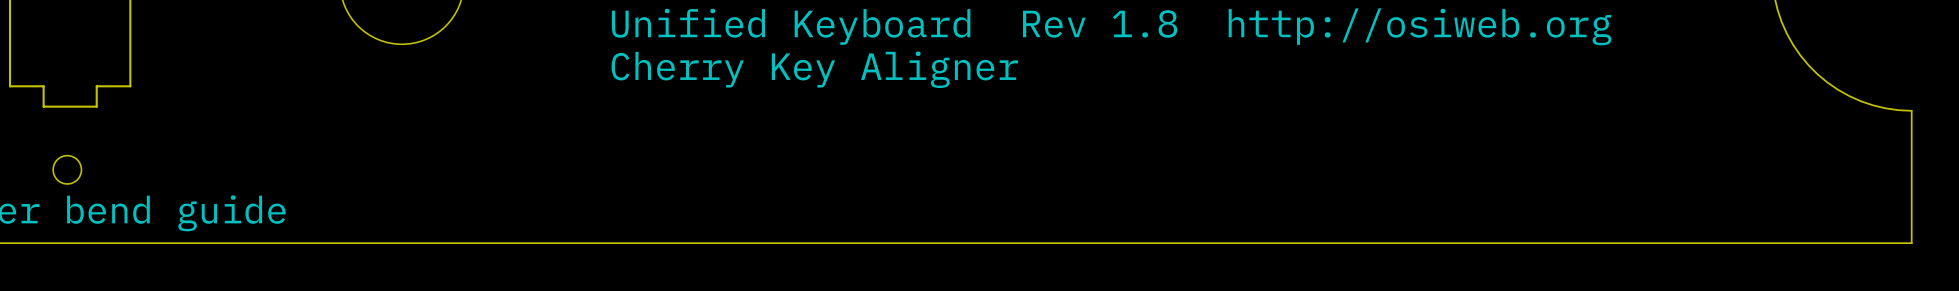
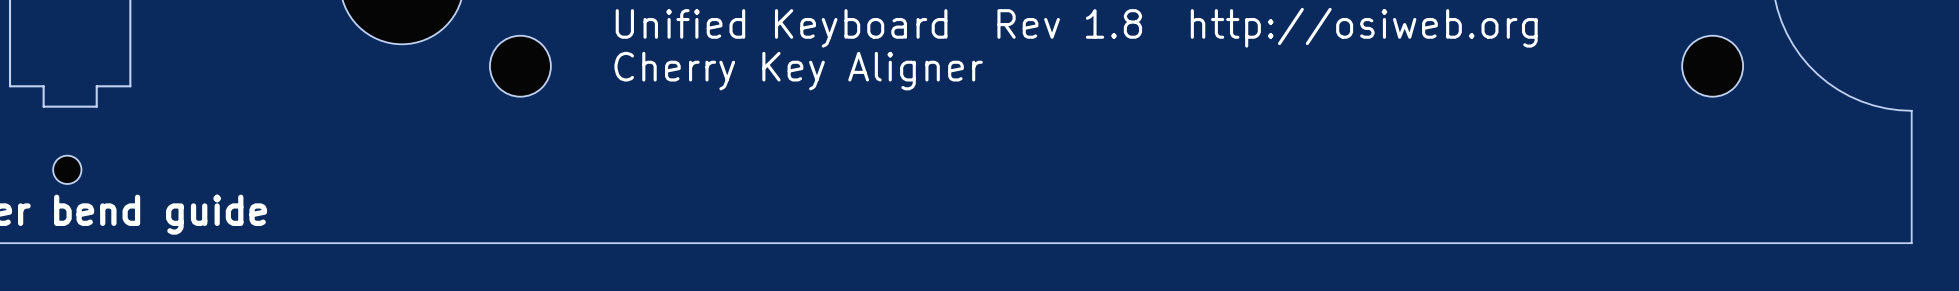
part: none -> (520, 66)
part: none -> (1712, 66)

